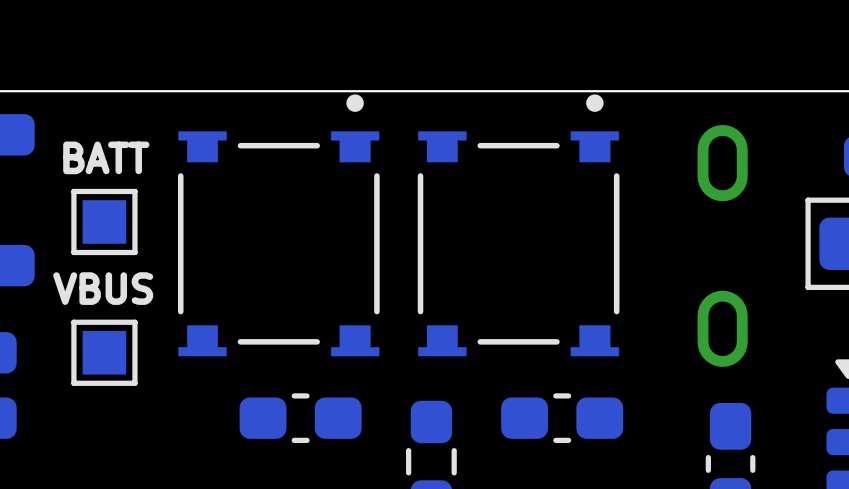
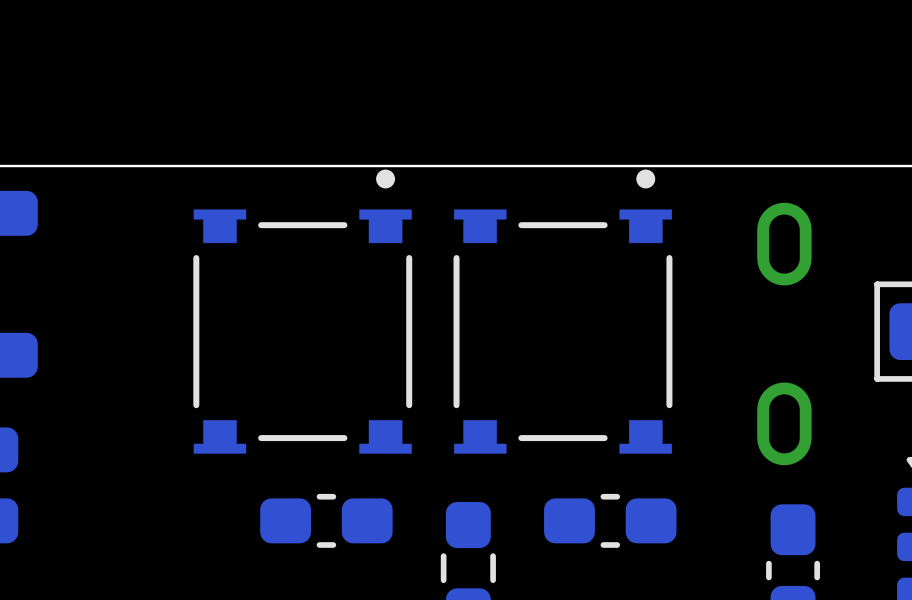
BATT: (104, 221) -> none
VBUS: (104, 352) -> none

